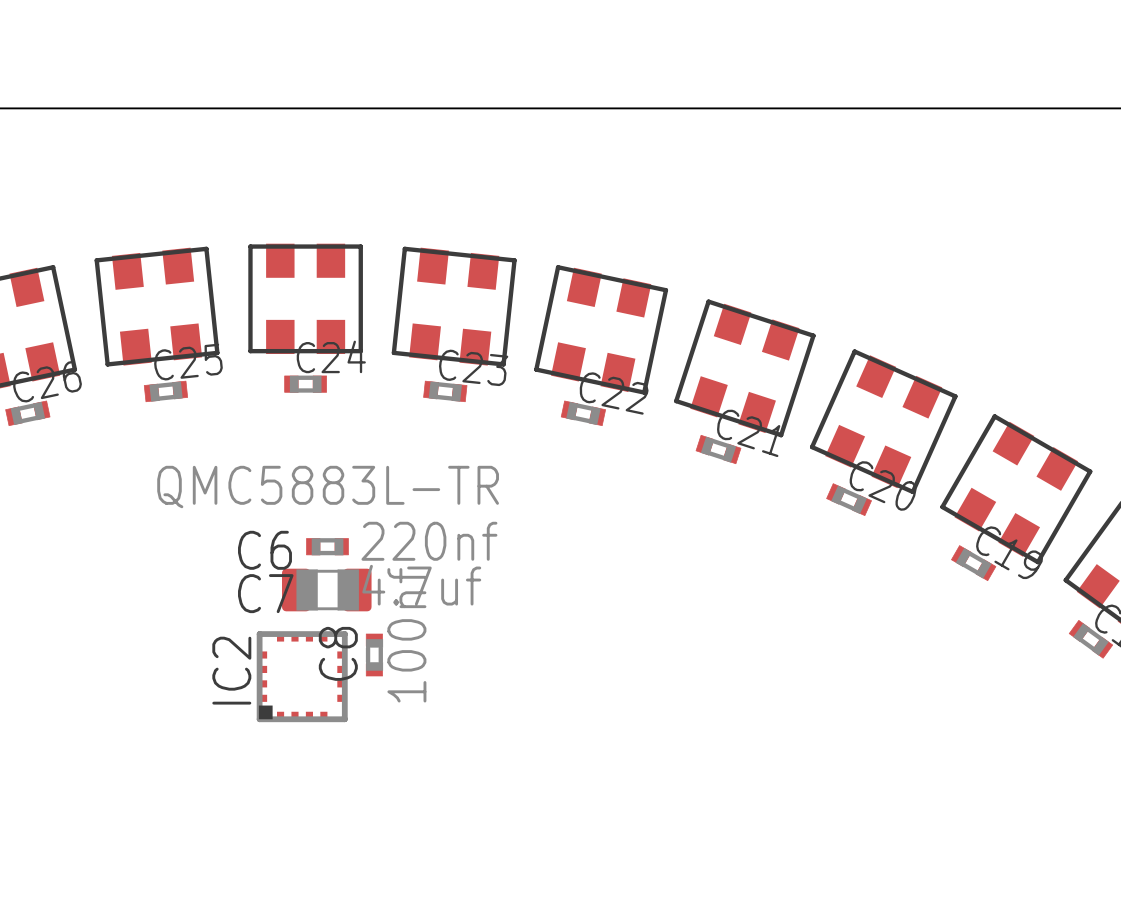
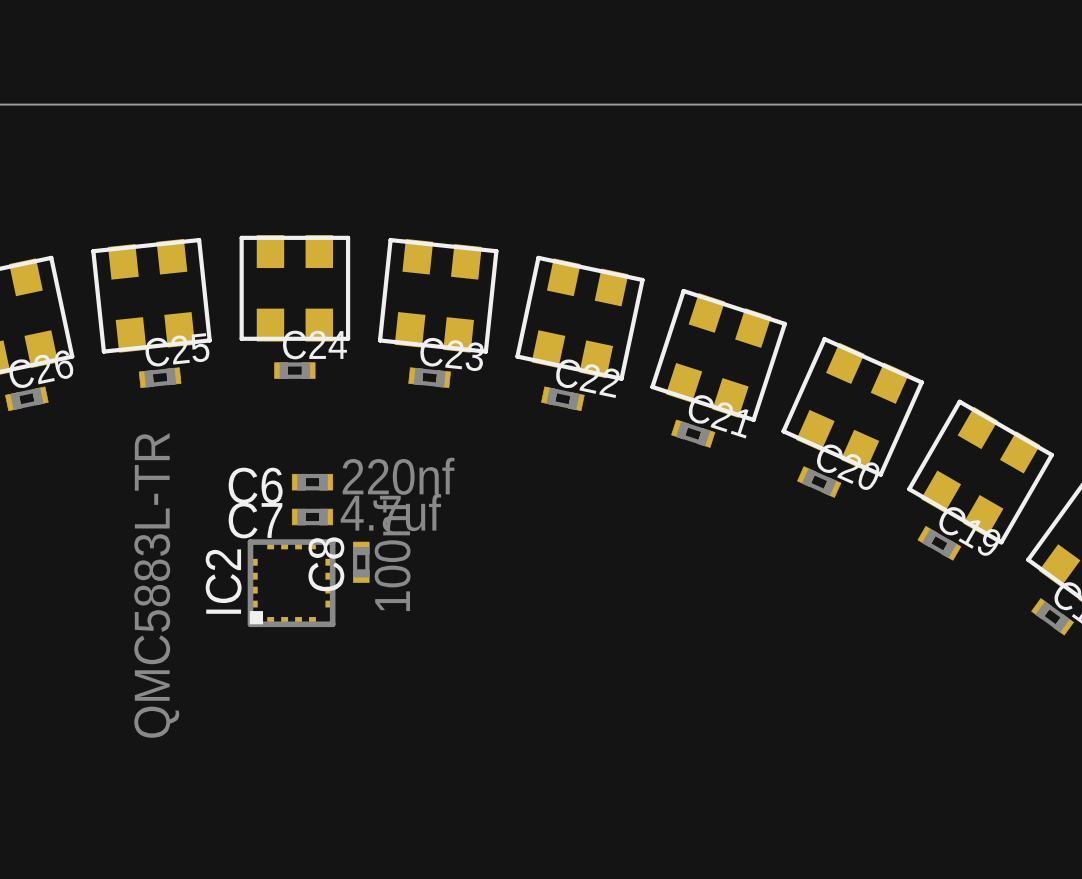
IC2 value rotation: 0° (328, 487) -> 90° counterclockwise (156, 585)
C6 position: (327, 546) -> (312, 482)
C7 footprint: [282, 568, 372, 612] -> [291, 508, 334, 526]
C8 position: (374, 655) -> (361, 562)
IC2 position: (302, 676) -> (291, 583)

